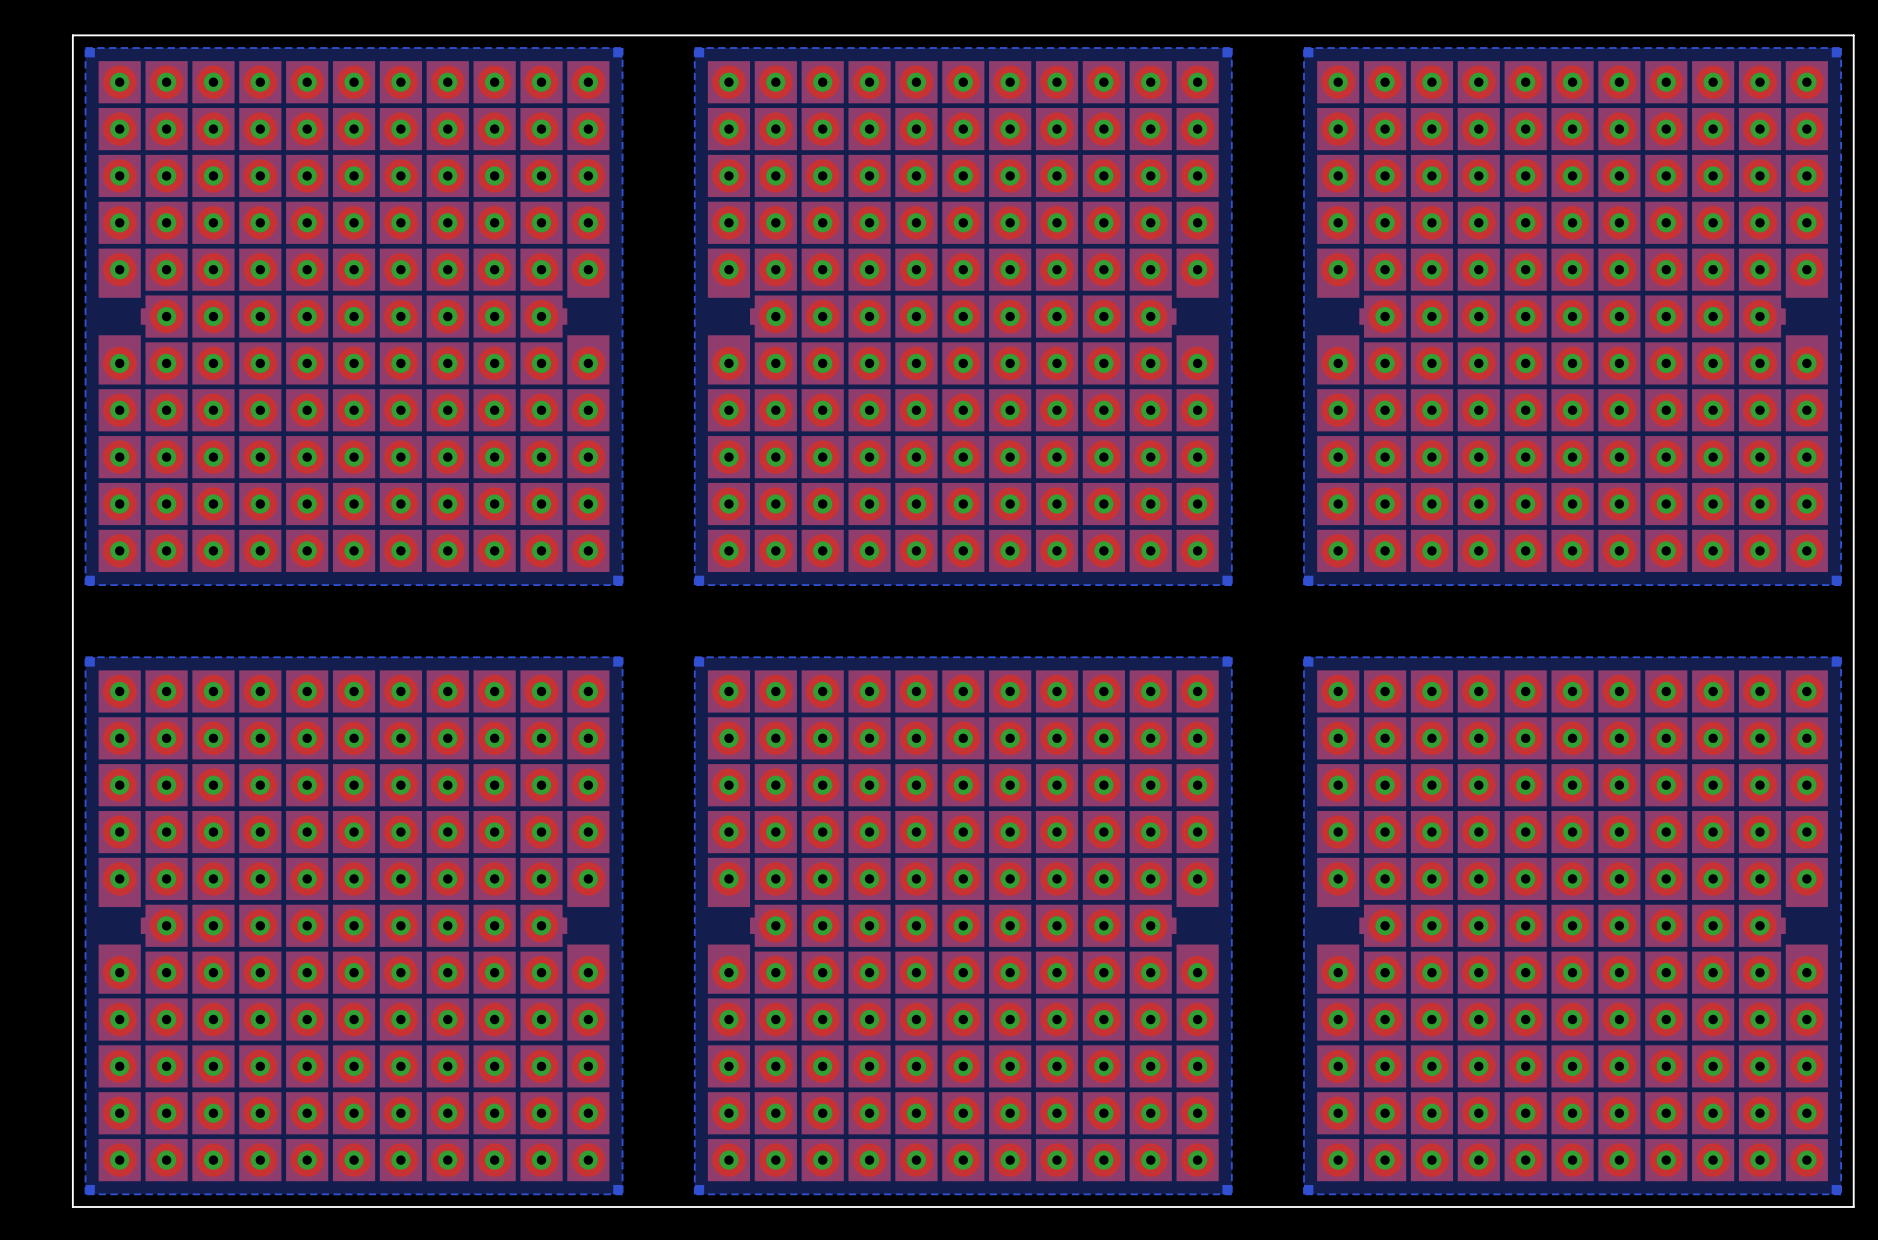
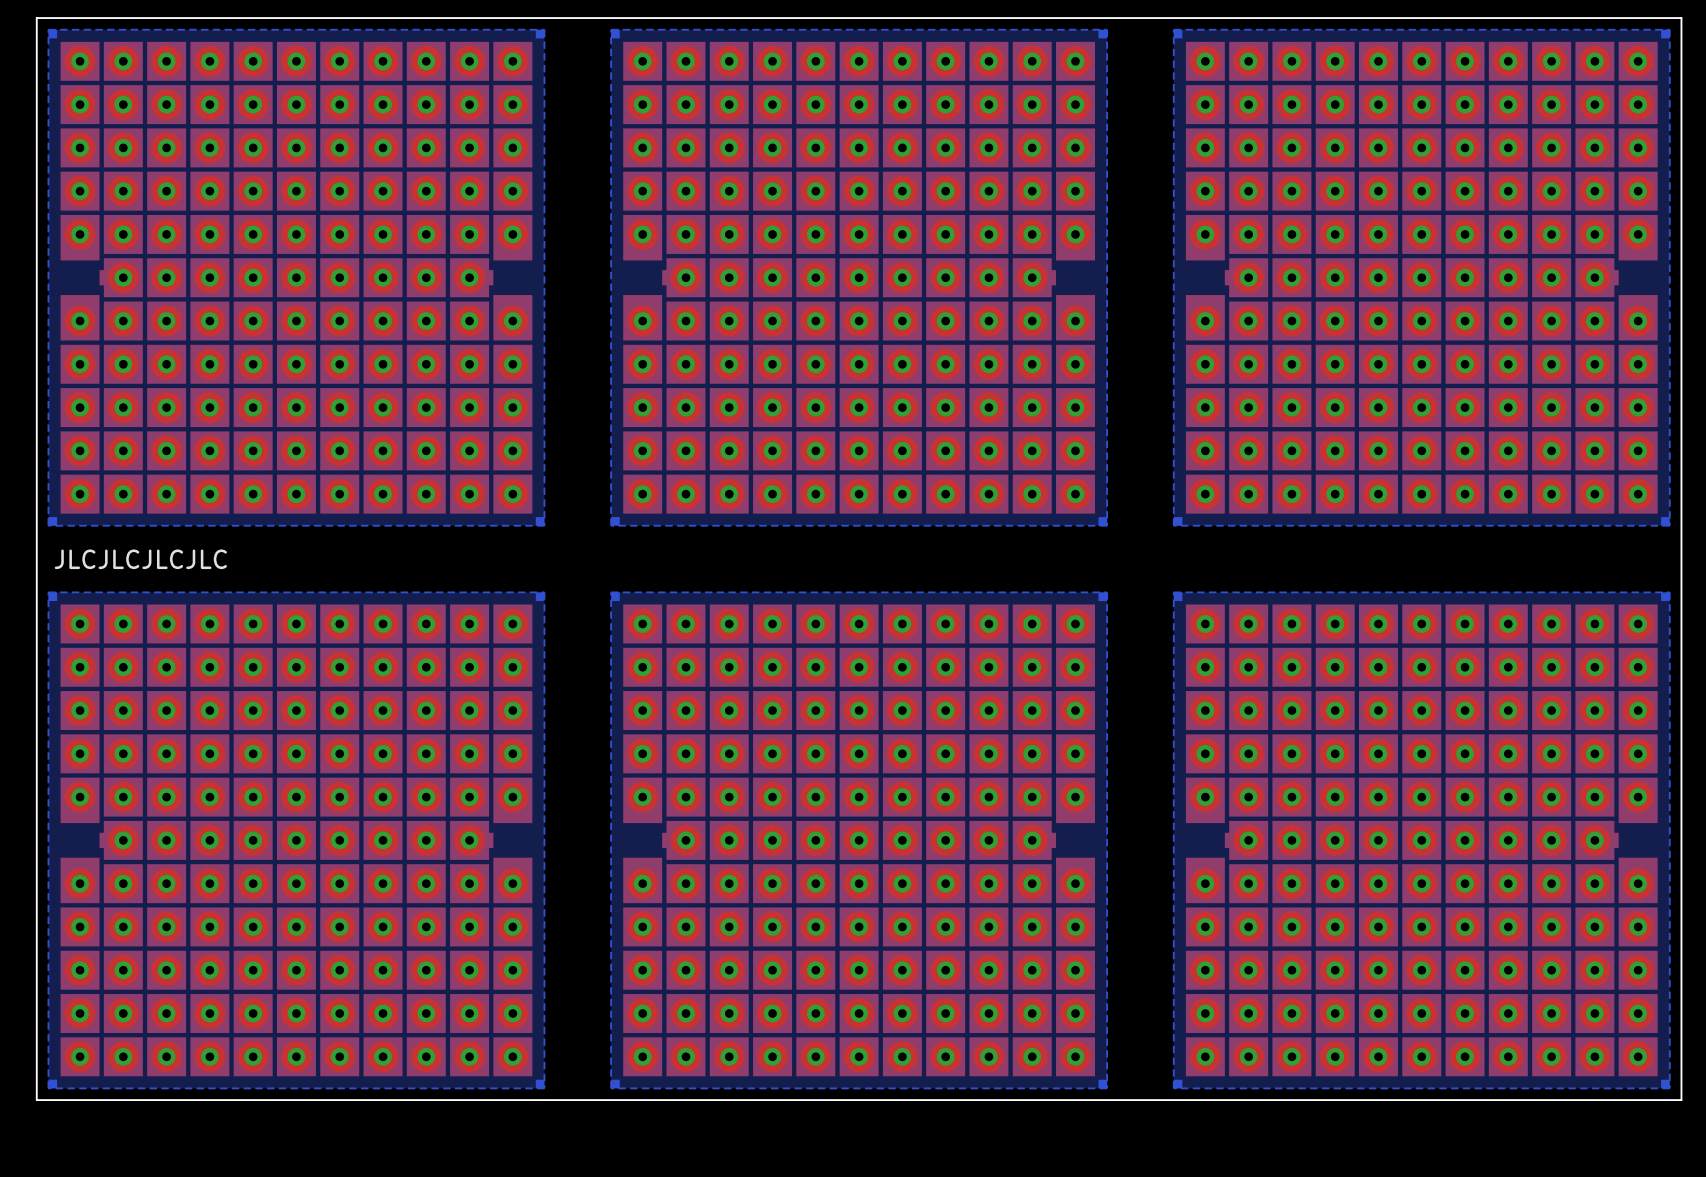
text: none -> JLCJLCJLCJLC (140, 559)

